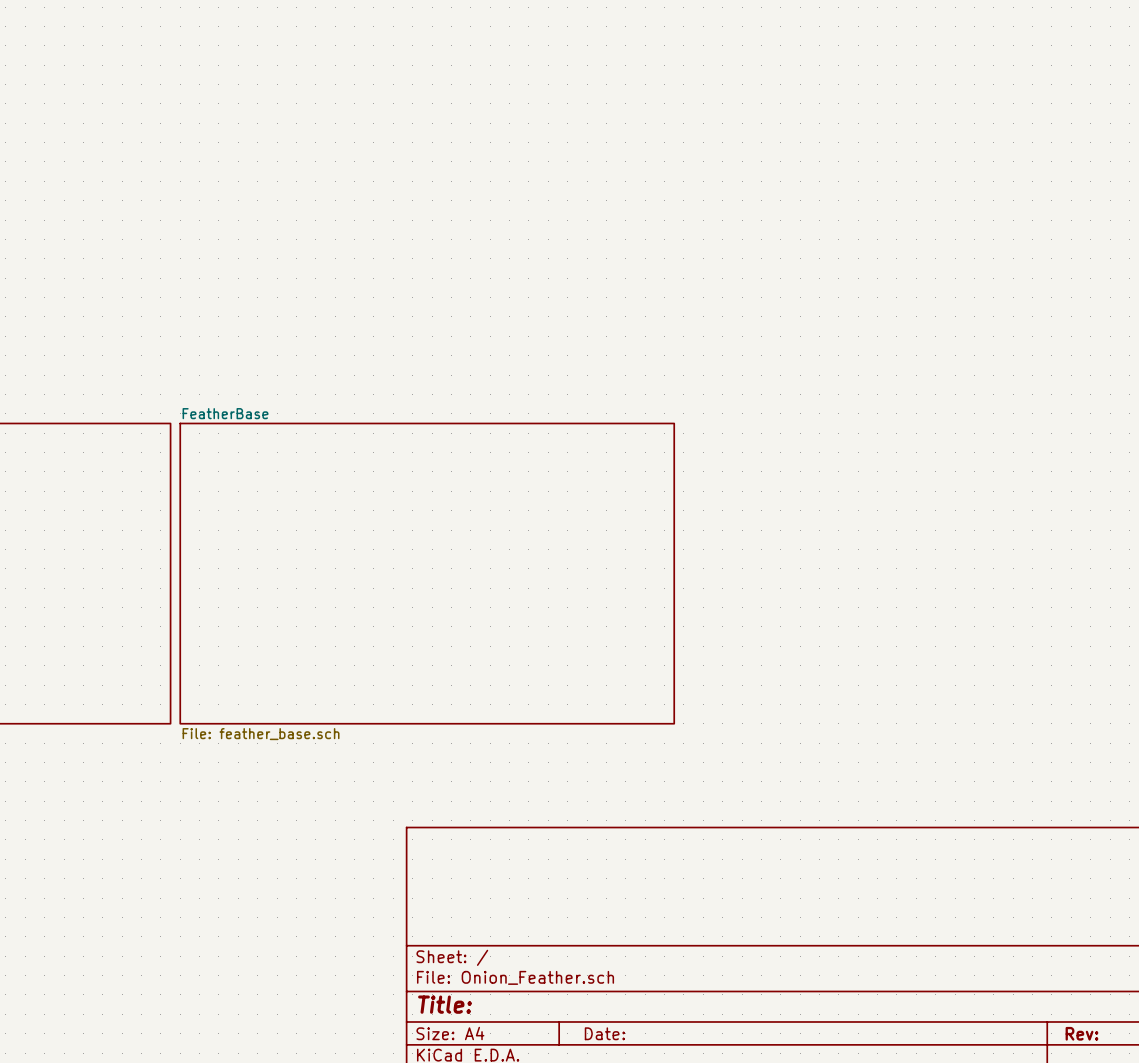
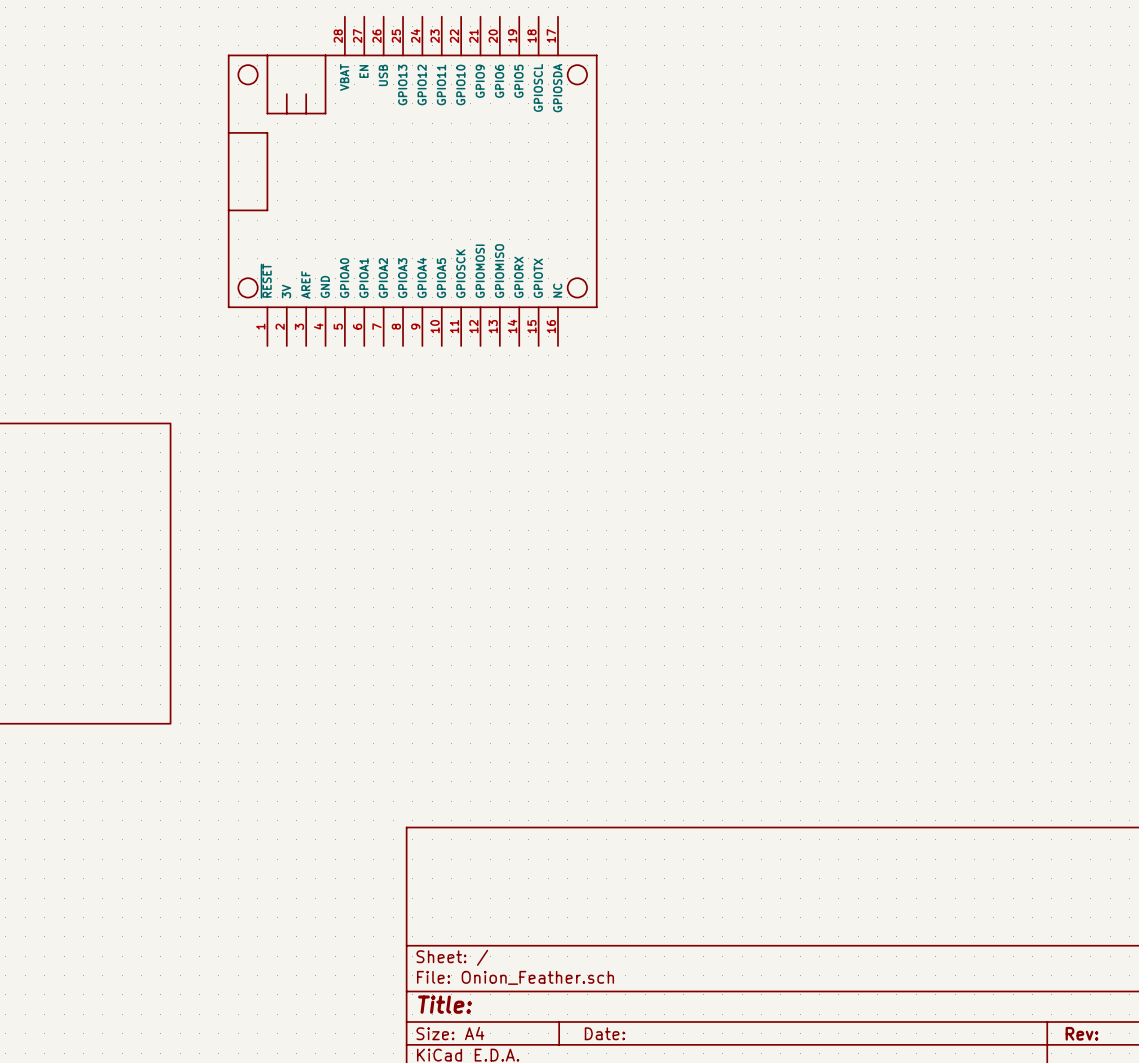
part: none -> (412, 181)
sheet FeatherBase: File: feather_base.sch (427, 573) -> none

